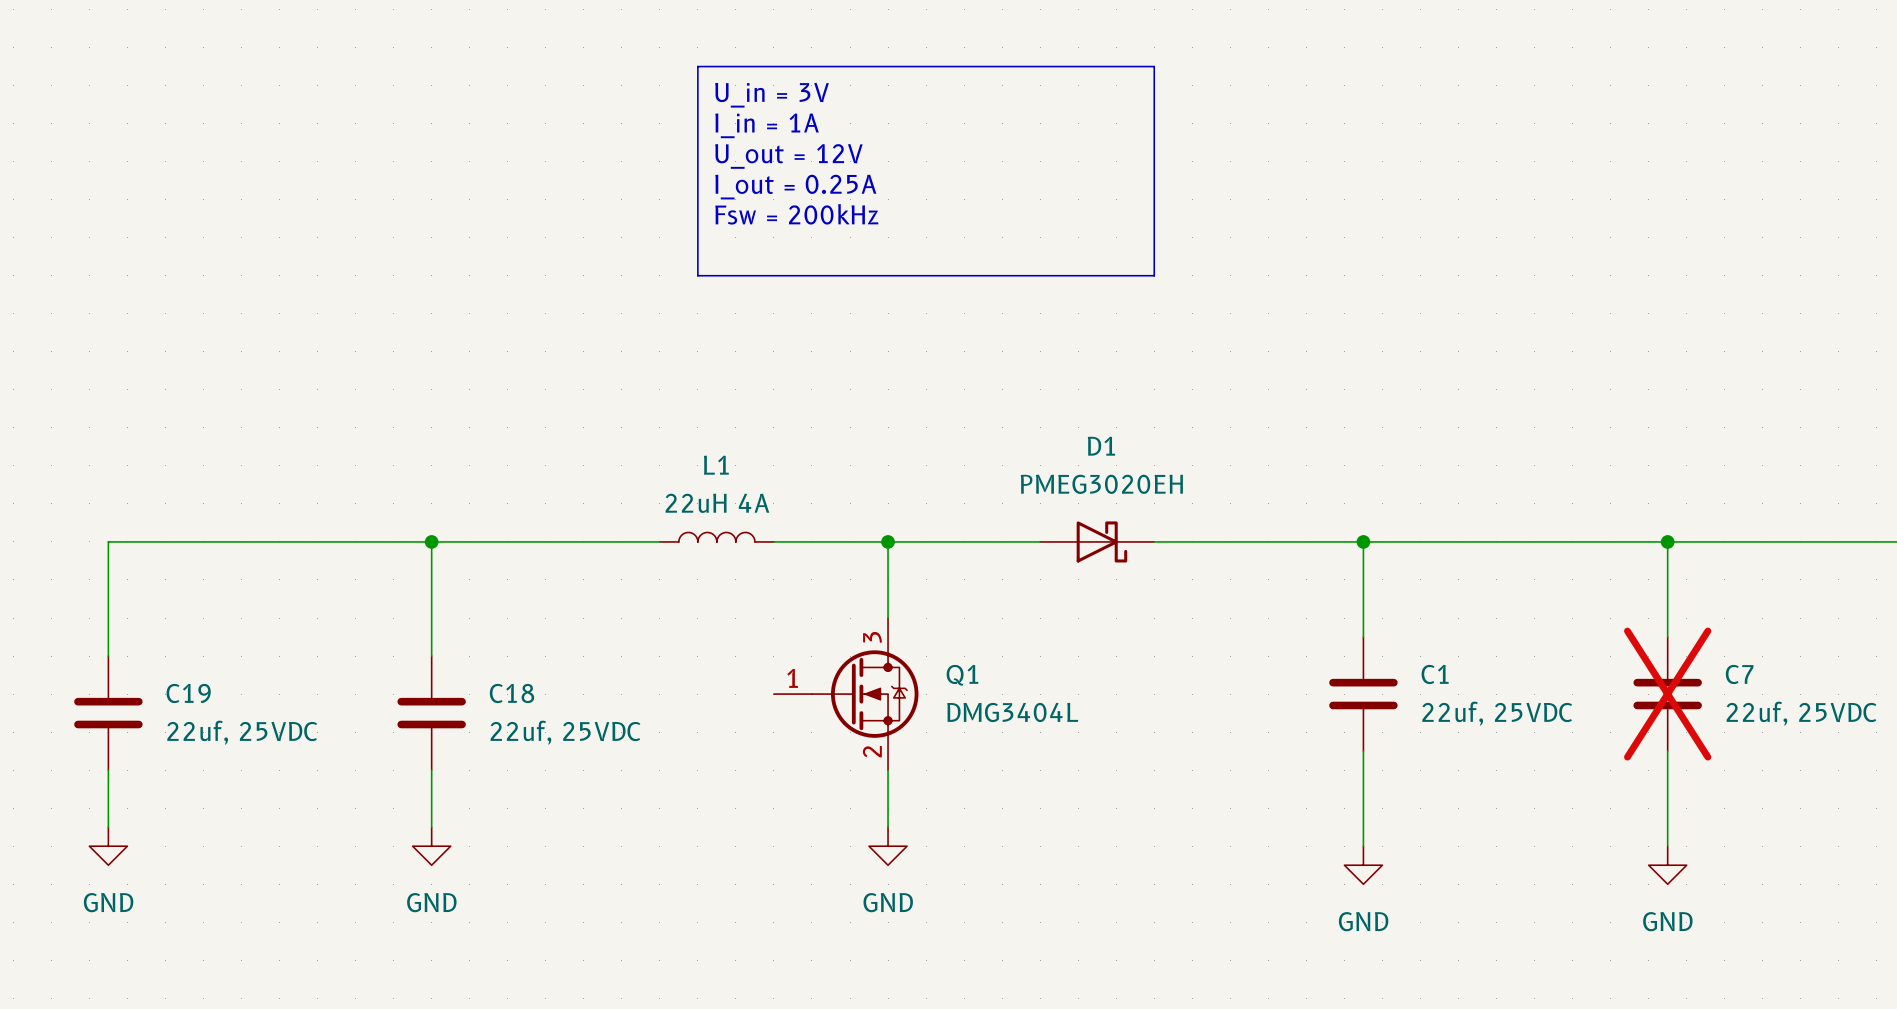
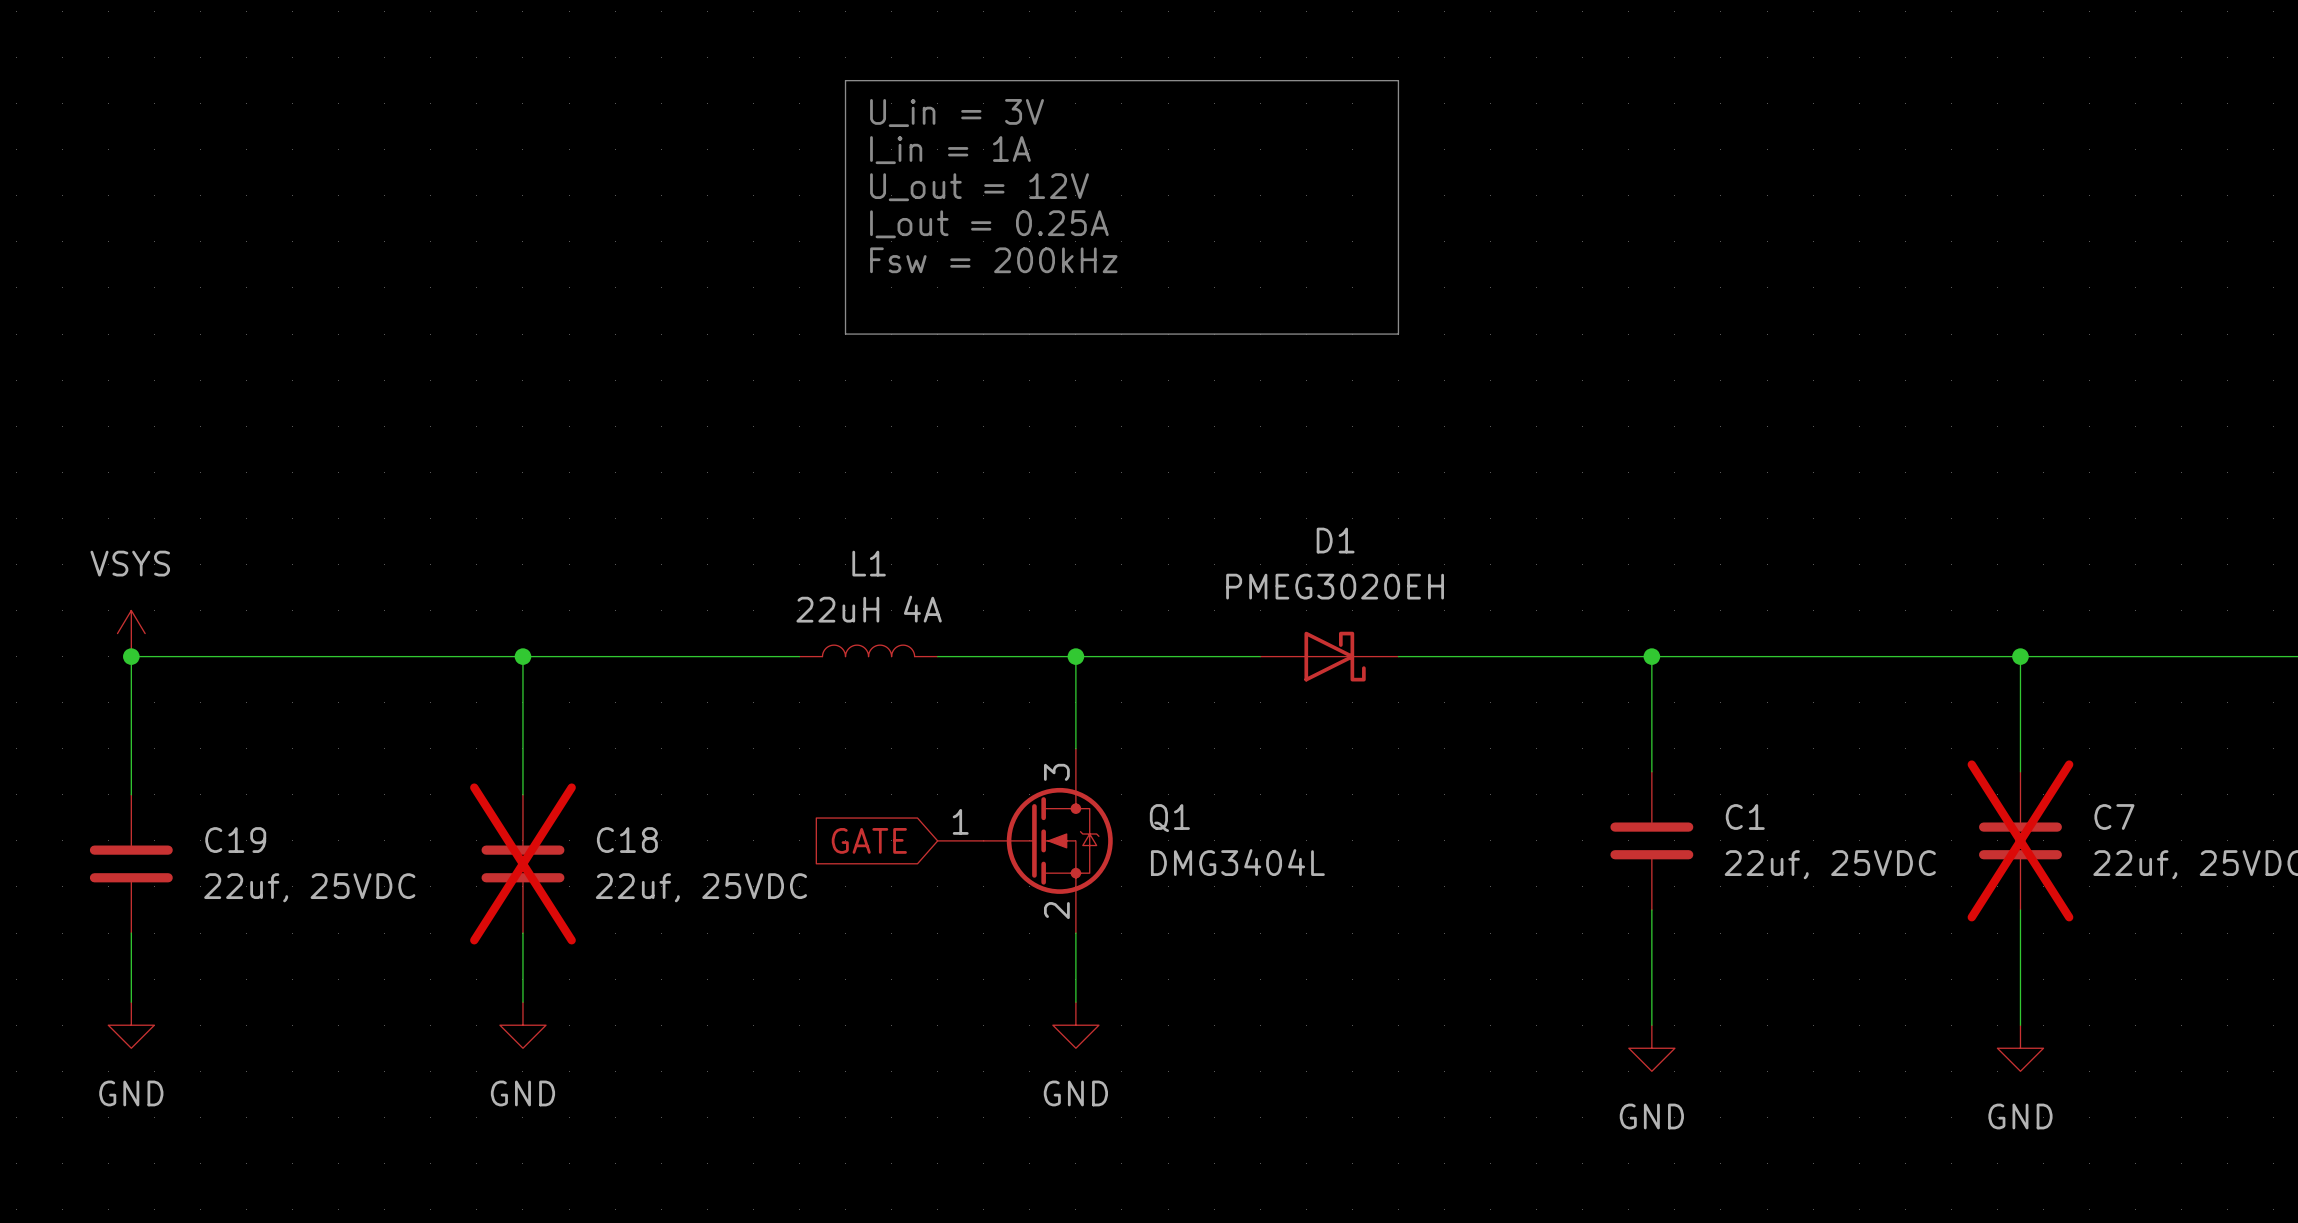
power symbol: none -> VSYS (131, 633)
junction: none -> (131, 656)
global label: none -> GATE (869, 840)
C18 do-not-place cross: none -> (522, 863)

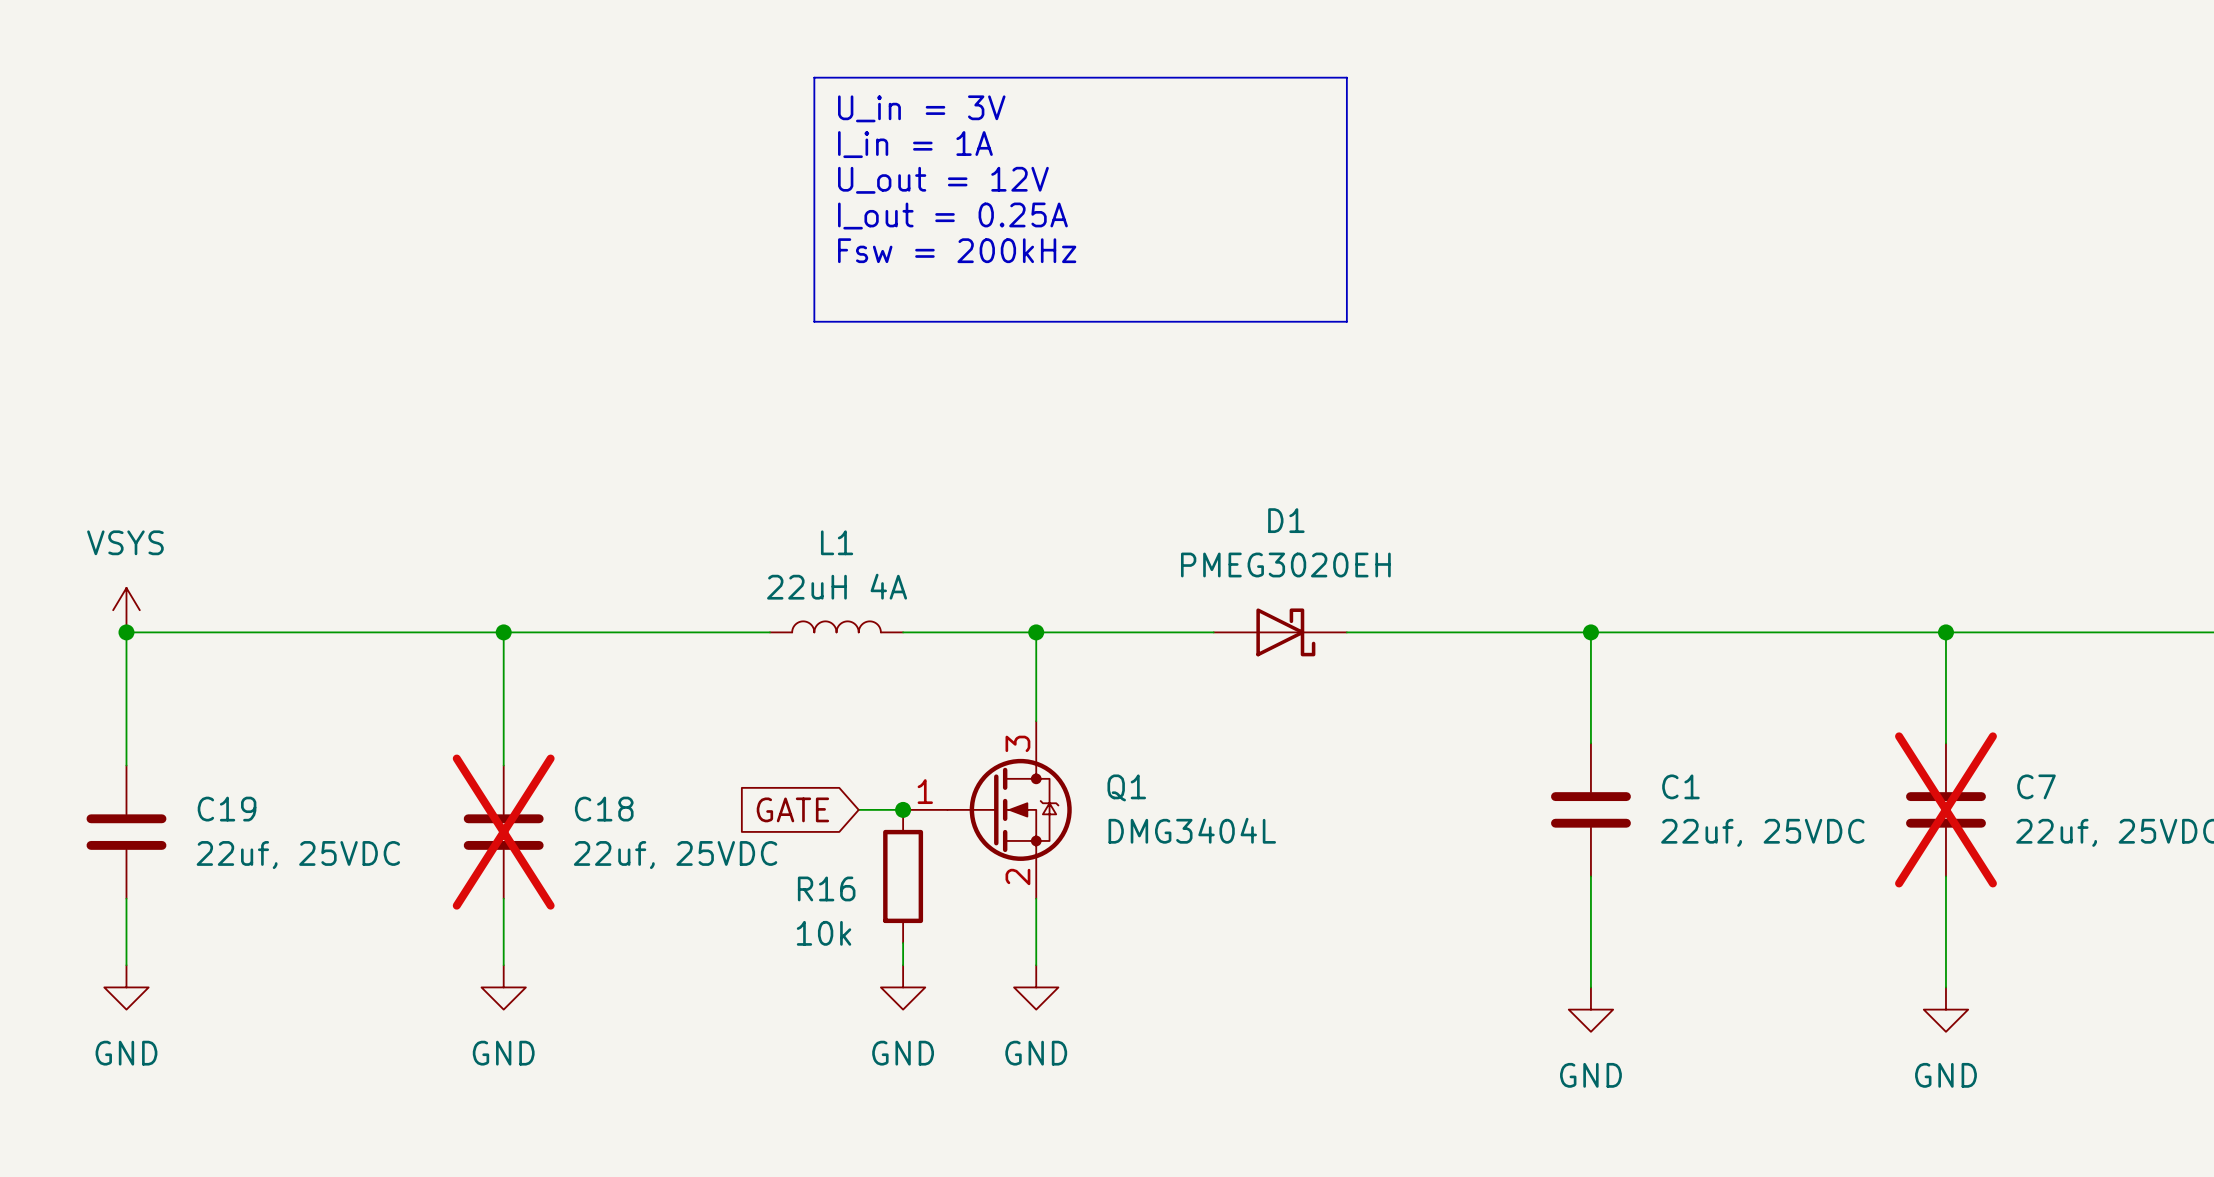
global label position: GATE (869, 840) -> GATE (792, 809)
wire: none -> (858, 809) (903, 809)
junction: none -> (903, 809)
R16: none -> 10k (903, 876)
wire: none -> (903, 943) (903, 965)
power symbol: none -> GND (903, 987)

